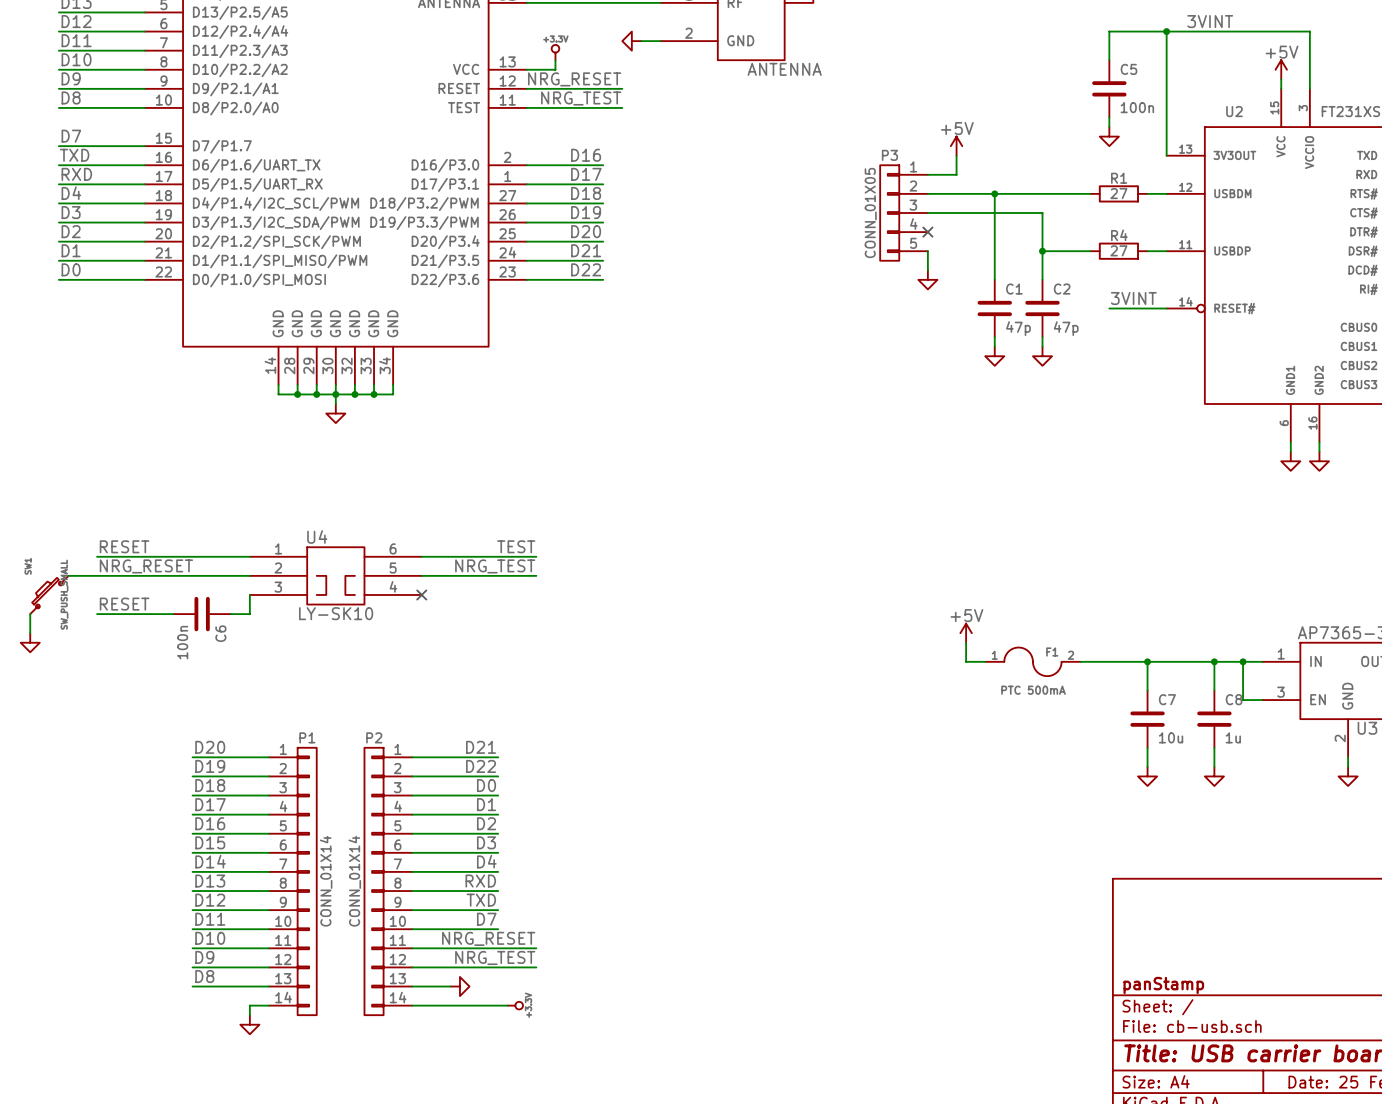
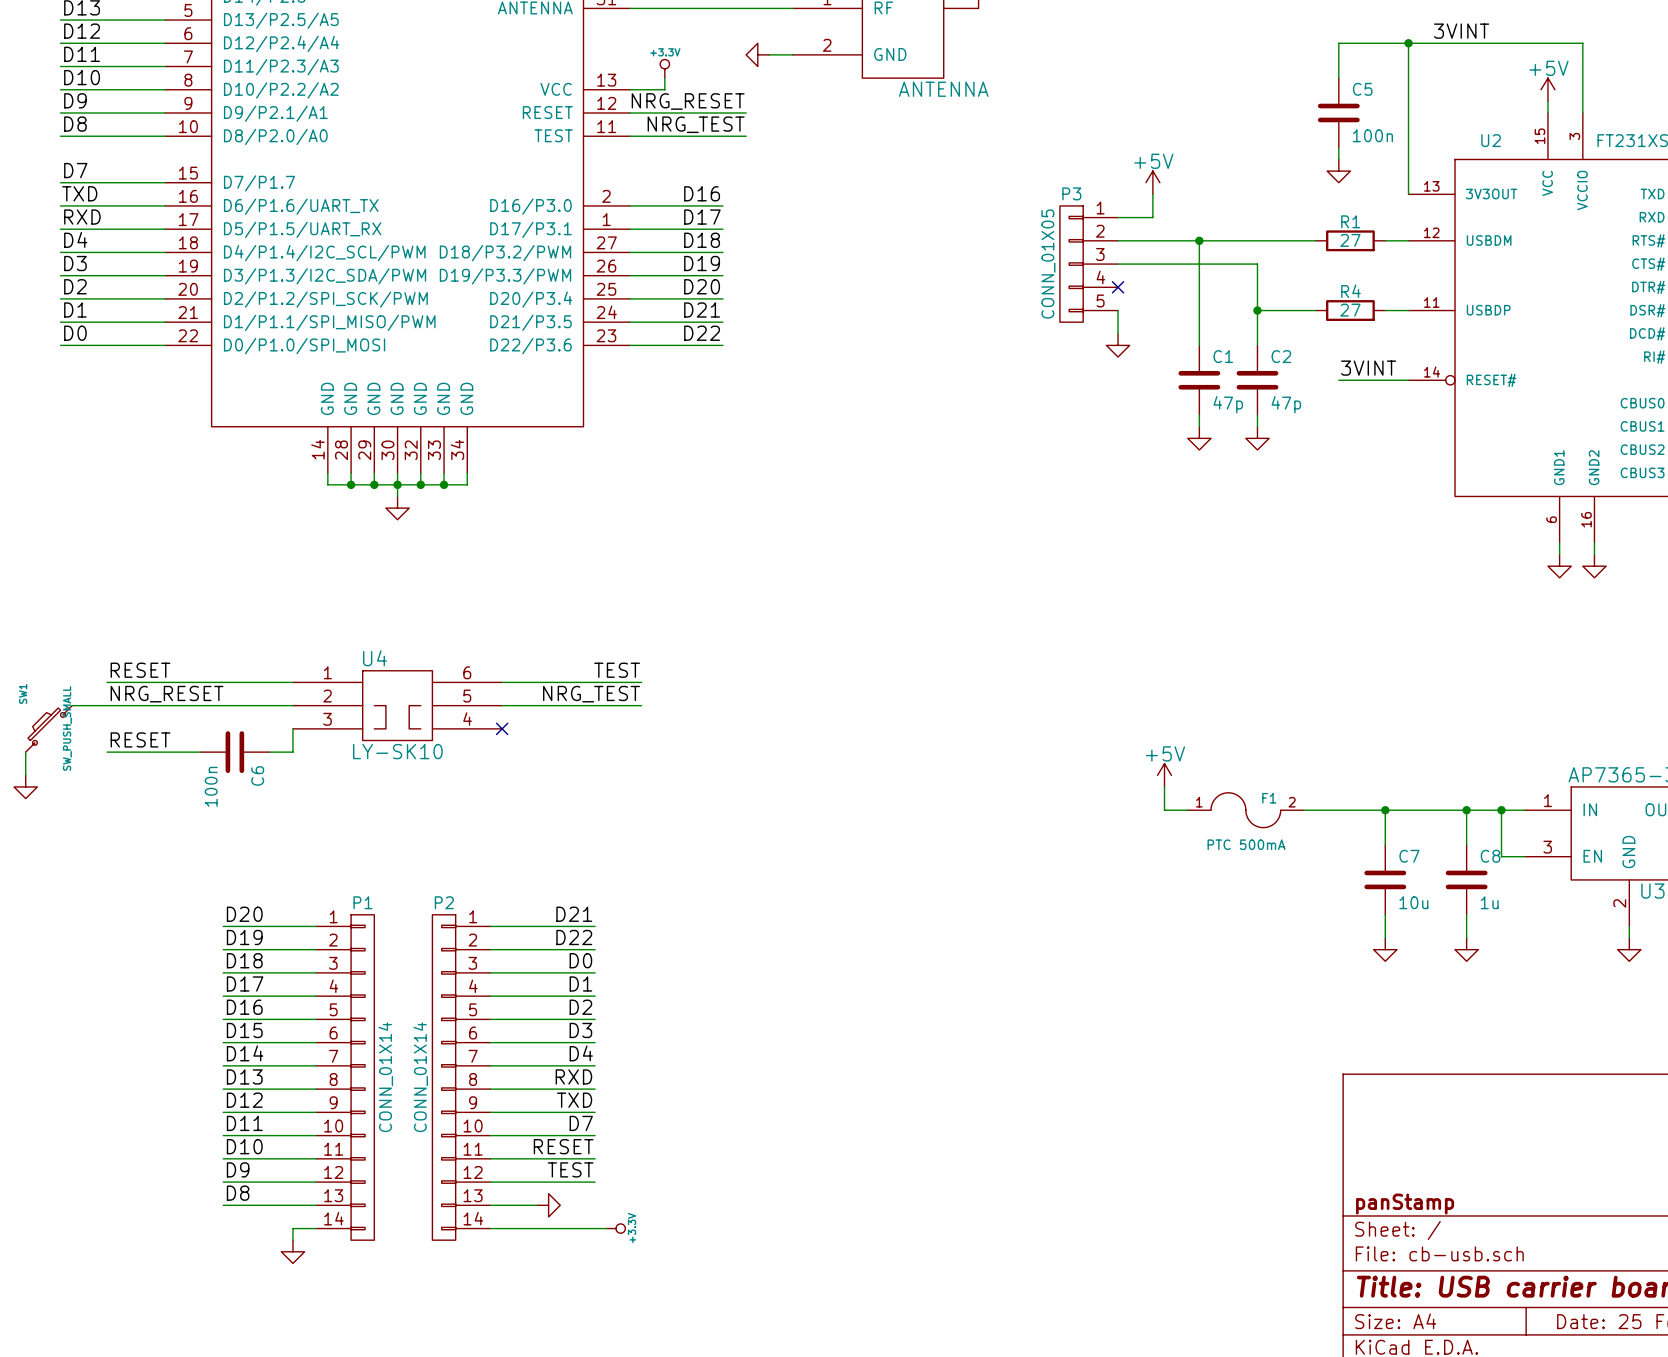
label: none -> RESET (563, 1146)
label: NRG_RESET (488, 938) -> none
wire: (498, 948) (536, 948) -> none
label: none -> TEST (570, 1169)
label: NRG_TEST (495, 957) -> none
wire: (498, 967) (536, 967) -> none

